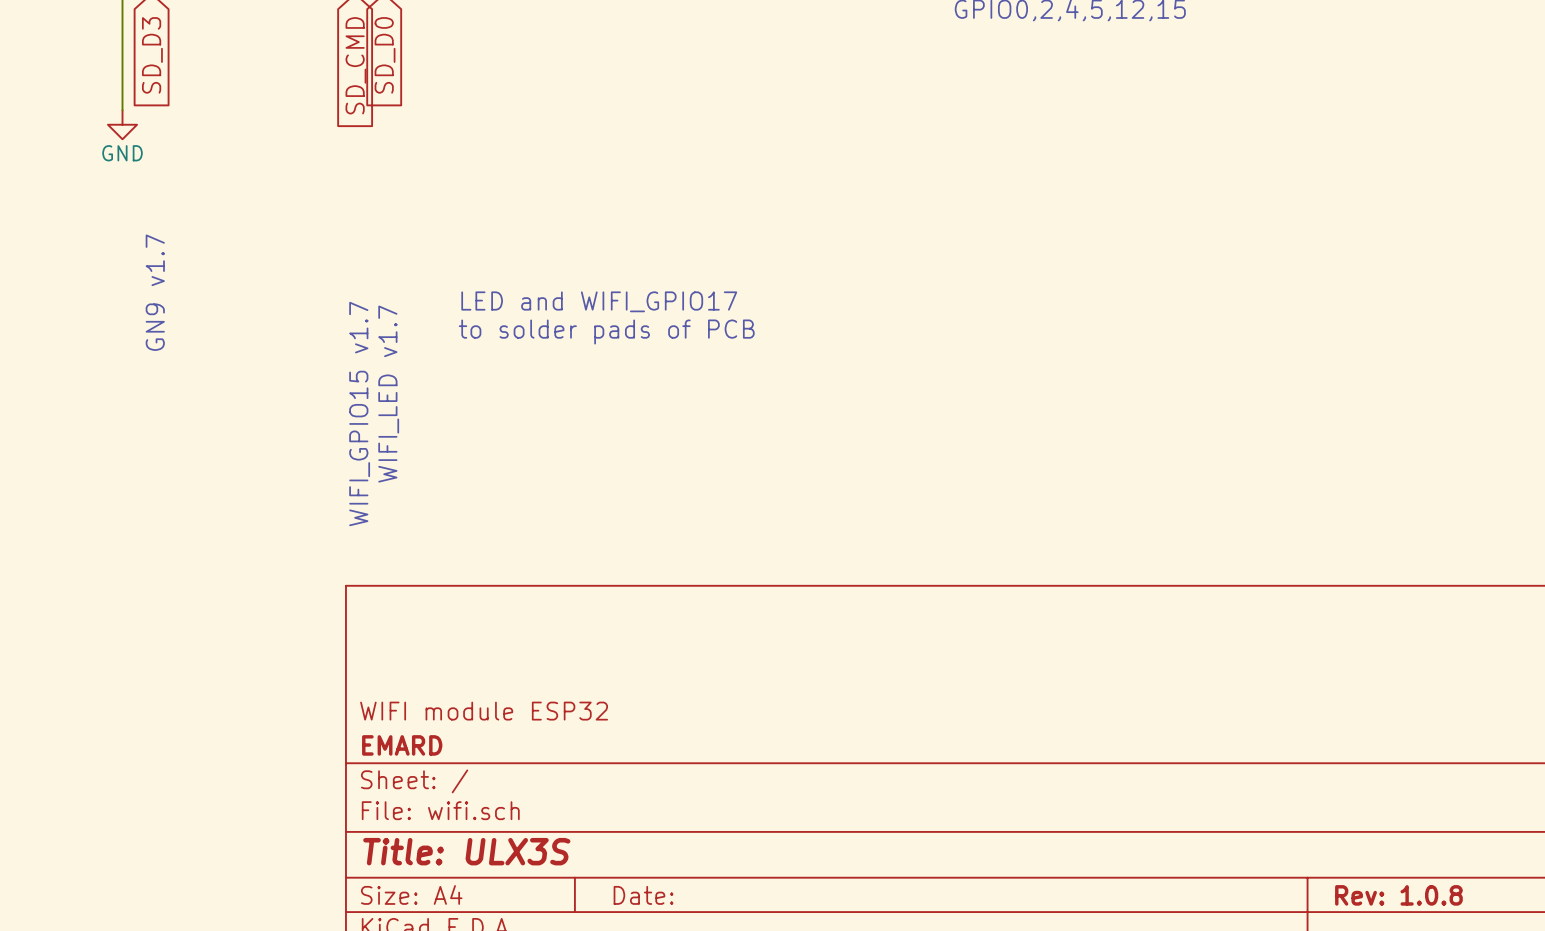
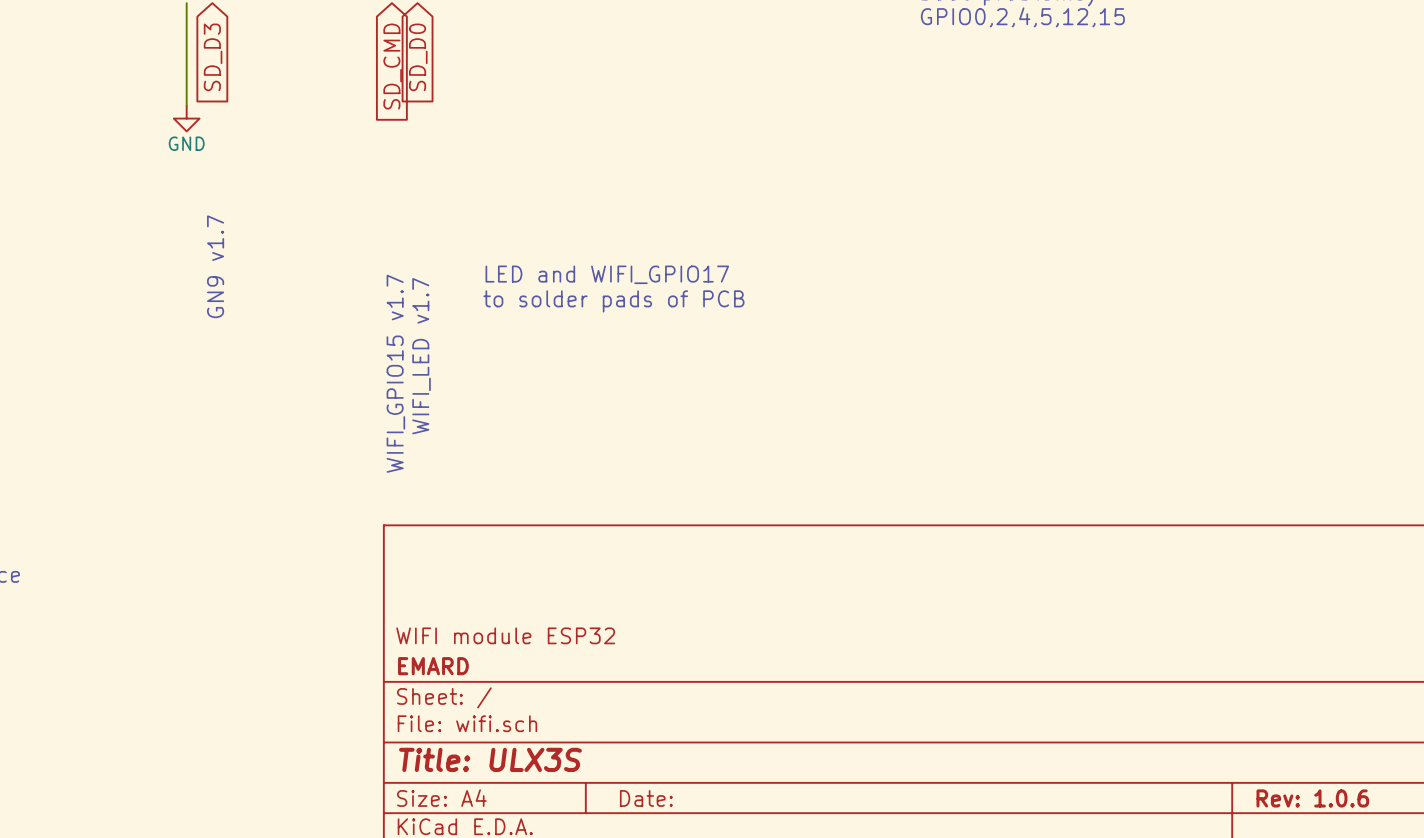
title block: Rev: 1.0.8 (1398, 895) -> Rev: 1.0.6 (1312, 798)

